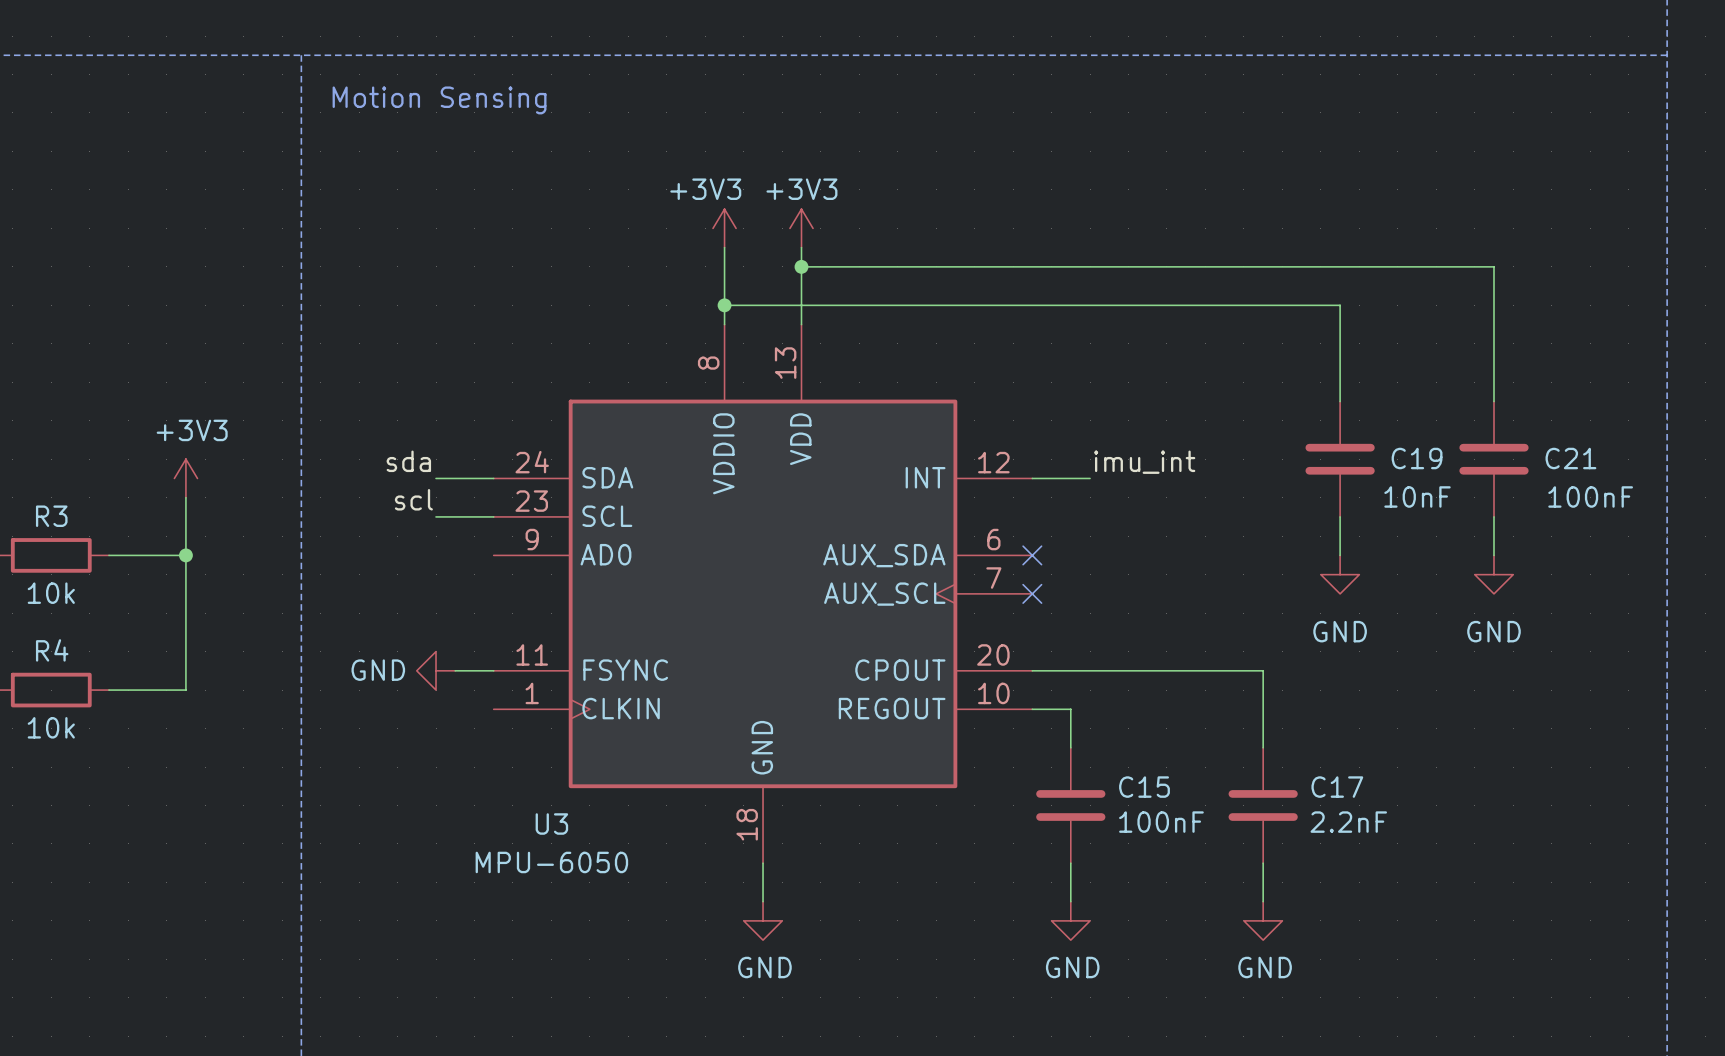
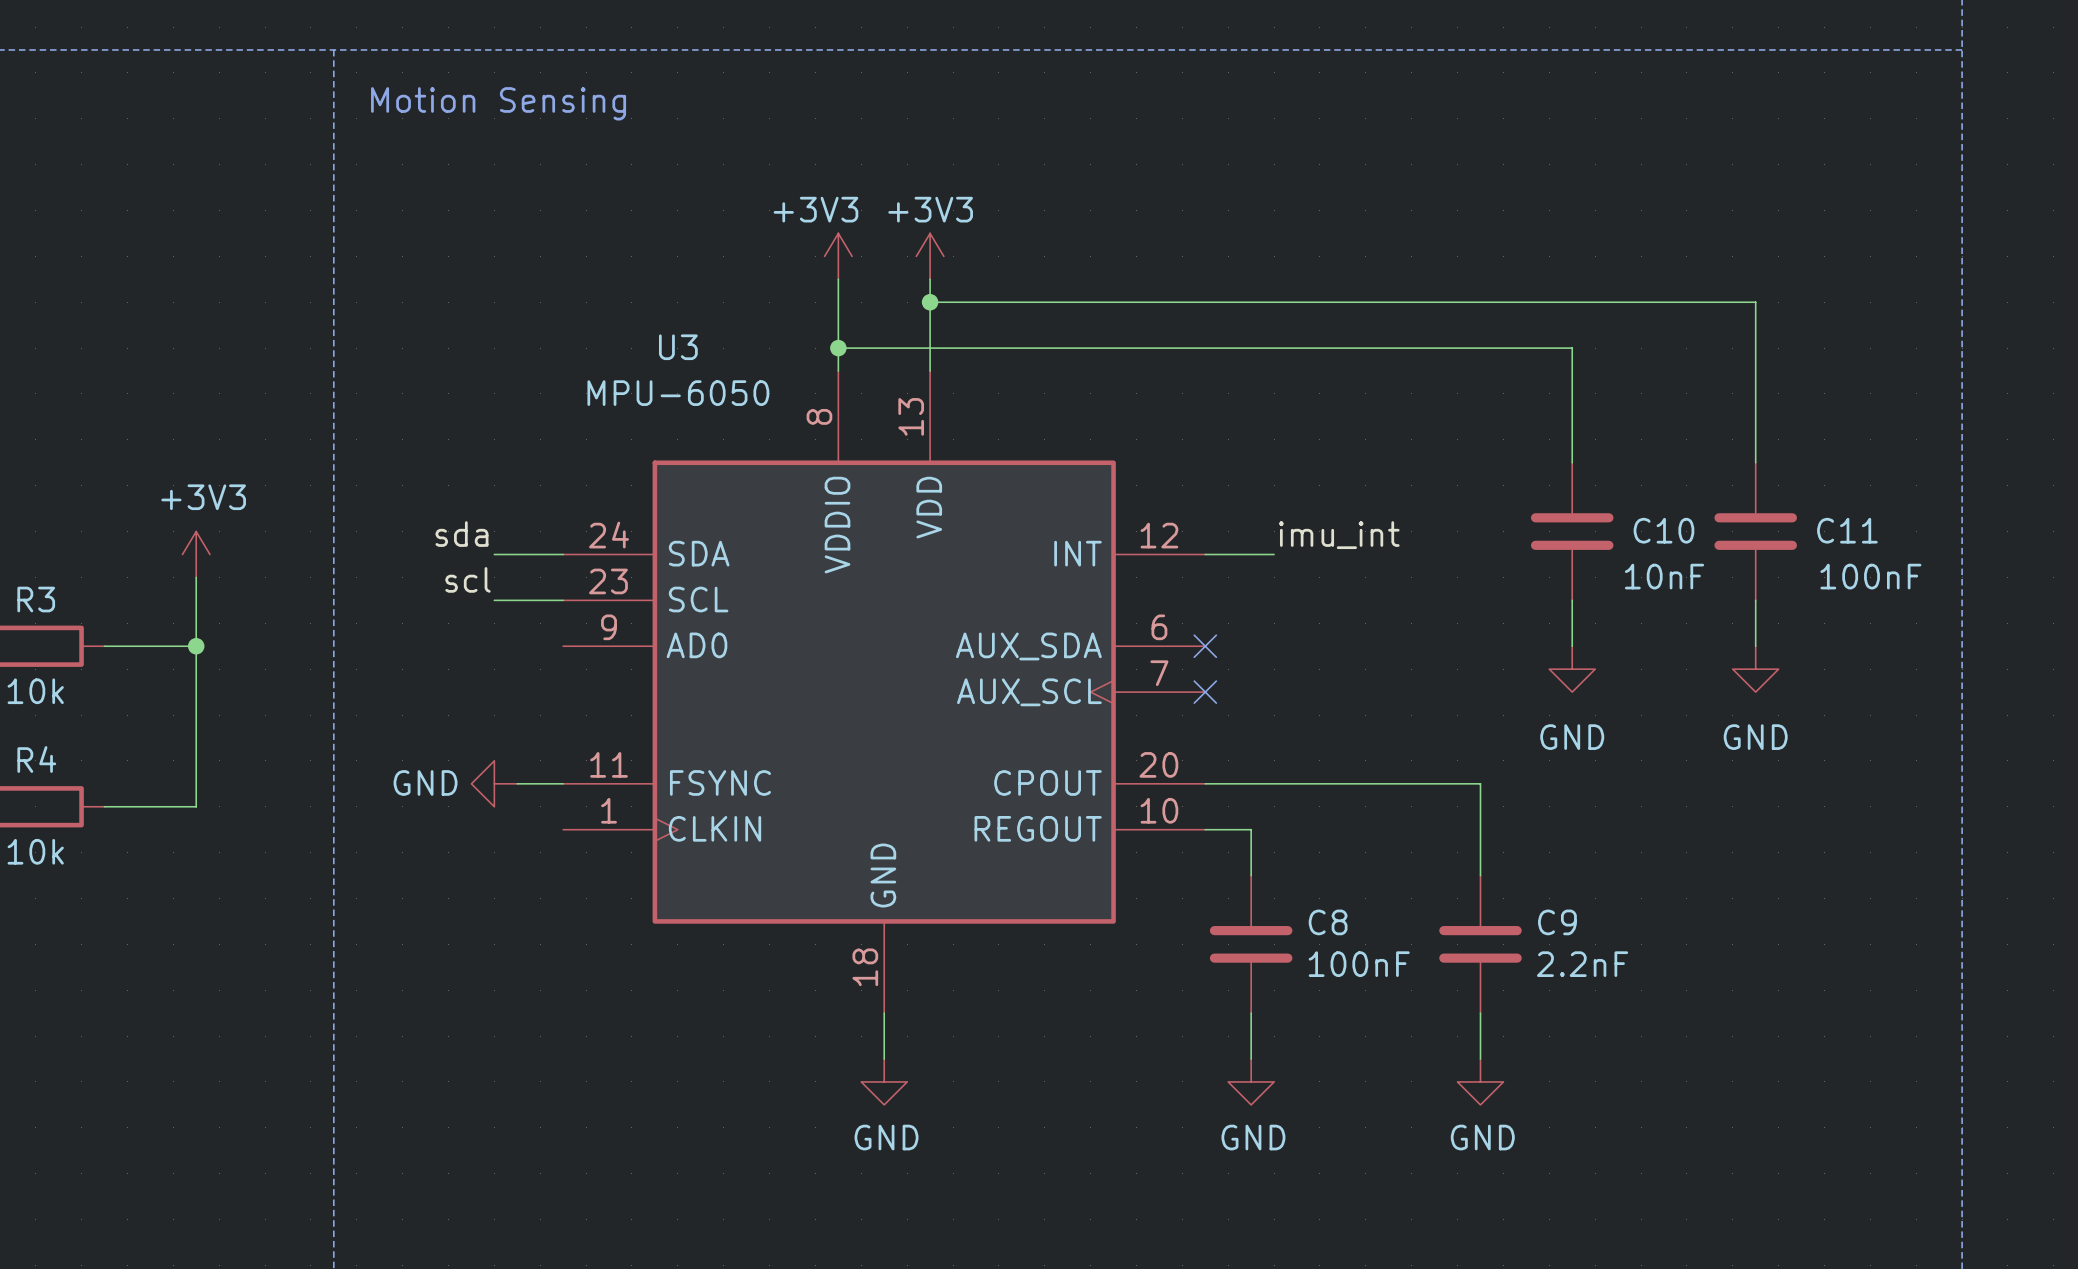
C19 name: C19 (1417, 458) -> C10 (1663, 530)
C21 name: C21 (1570, 458) -> C11 (1847, 530)
C15 name: C15 (1144, 787) -> C8 (1328, 922)
C17 name: C17 (1337, 787) -> C9 (1557, 922)
U3 name position: U3 (551, 824) -> U3 (678, 347)
U3 value position: MPU-6050 (551, 862) -> MPU-6050 (678, 393)

